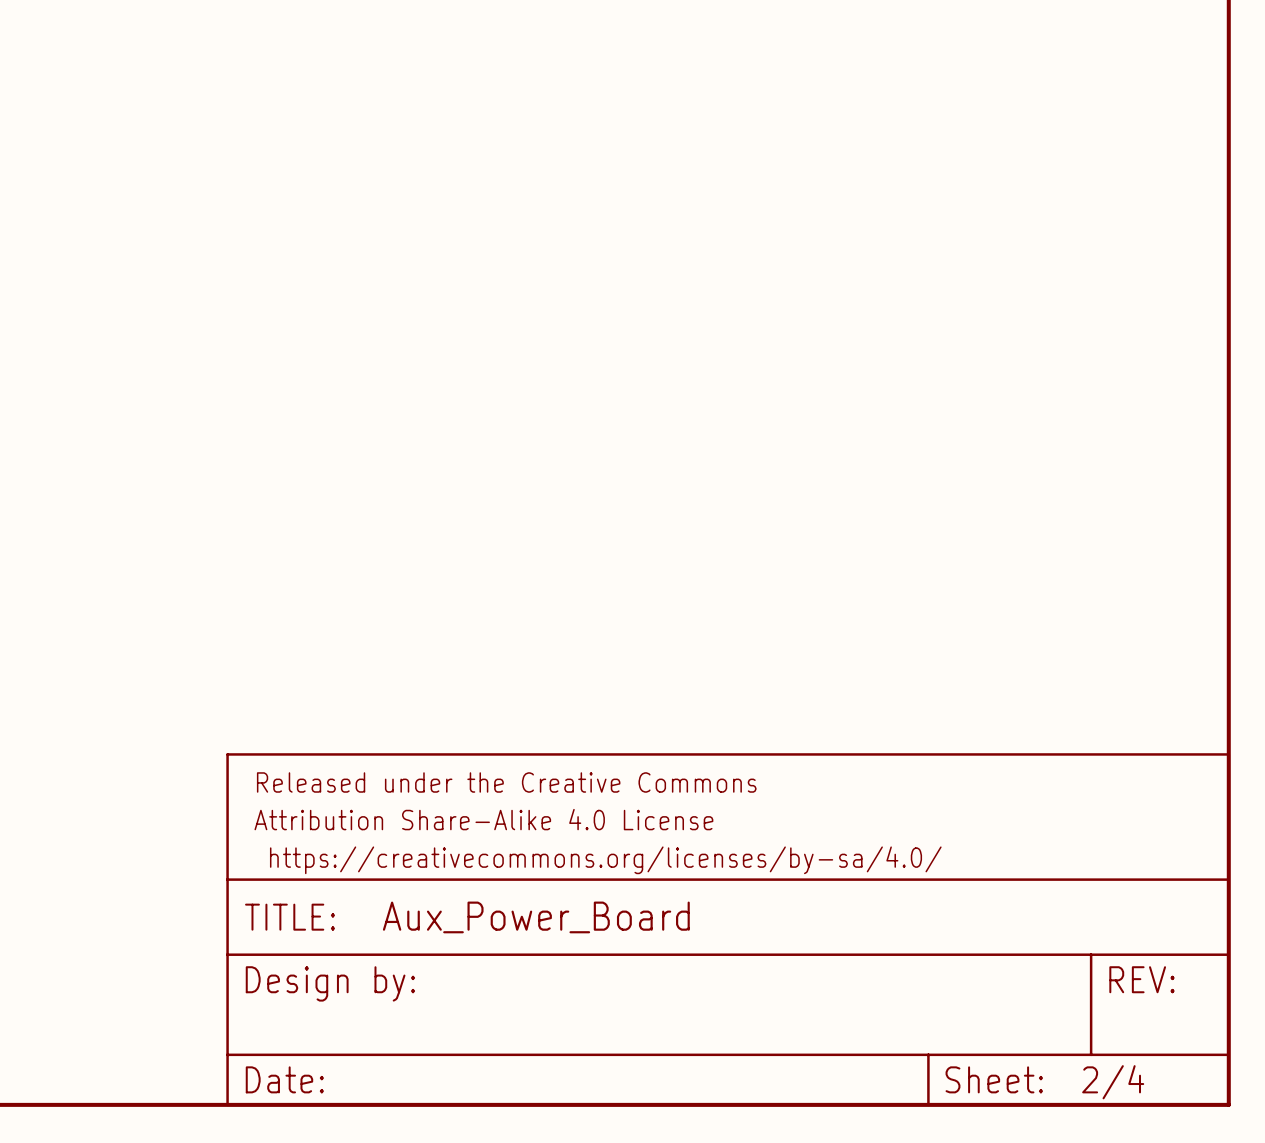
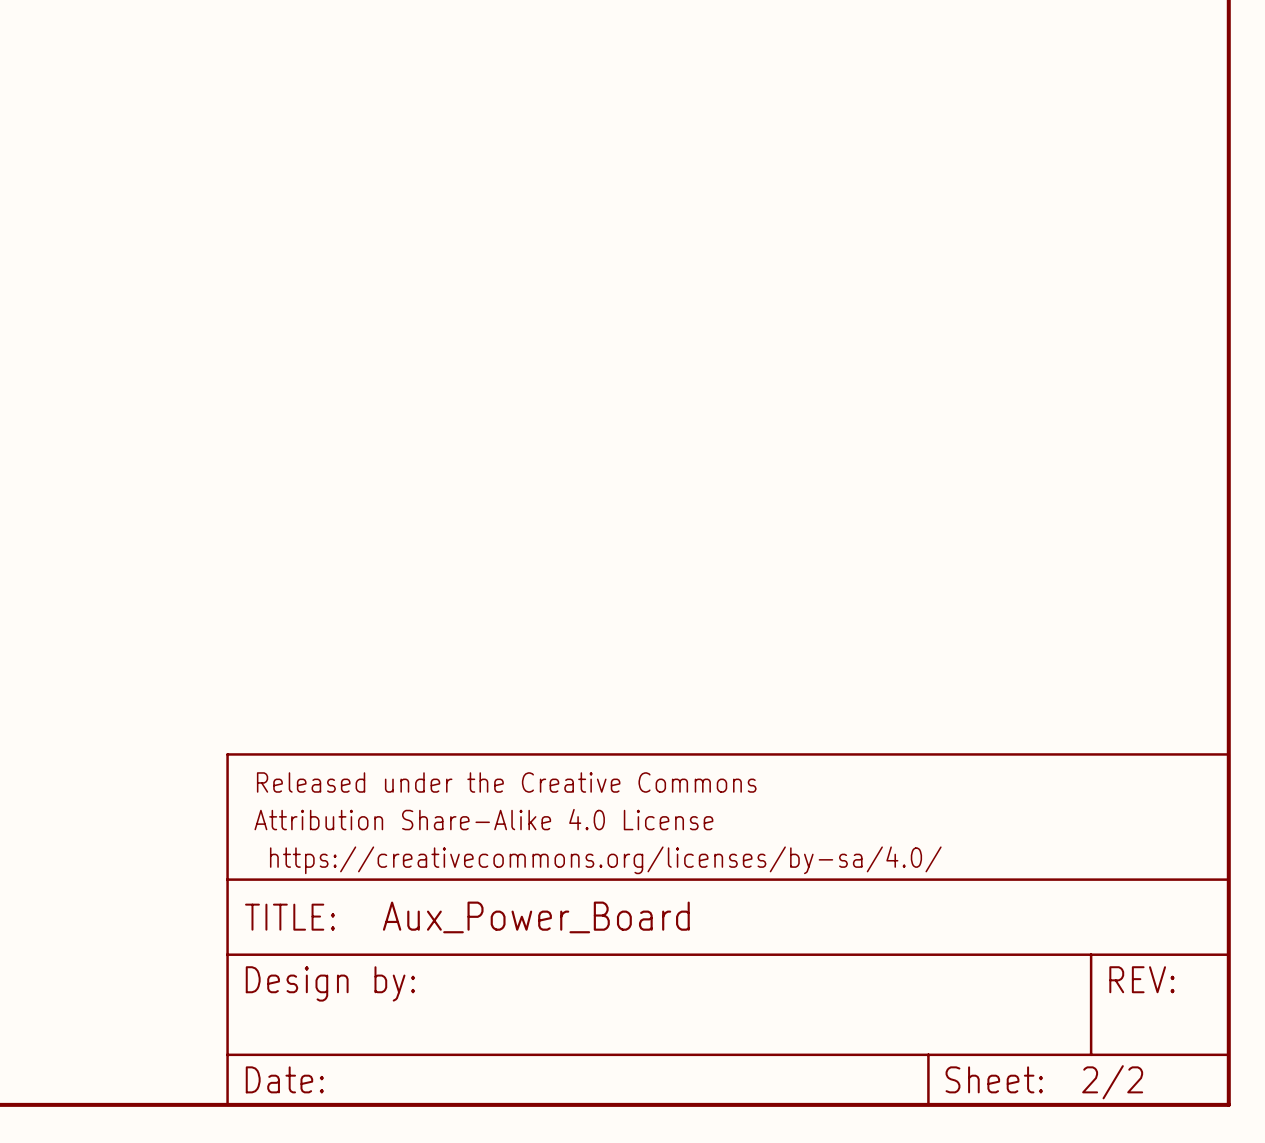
part text: 2/4 (1113, 1082) -> 2/2 (1112, 1082)

